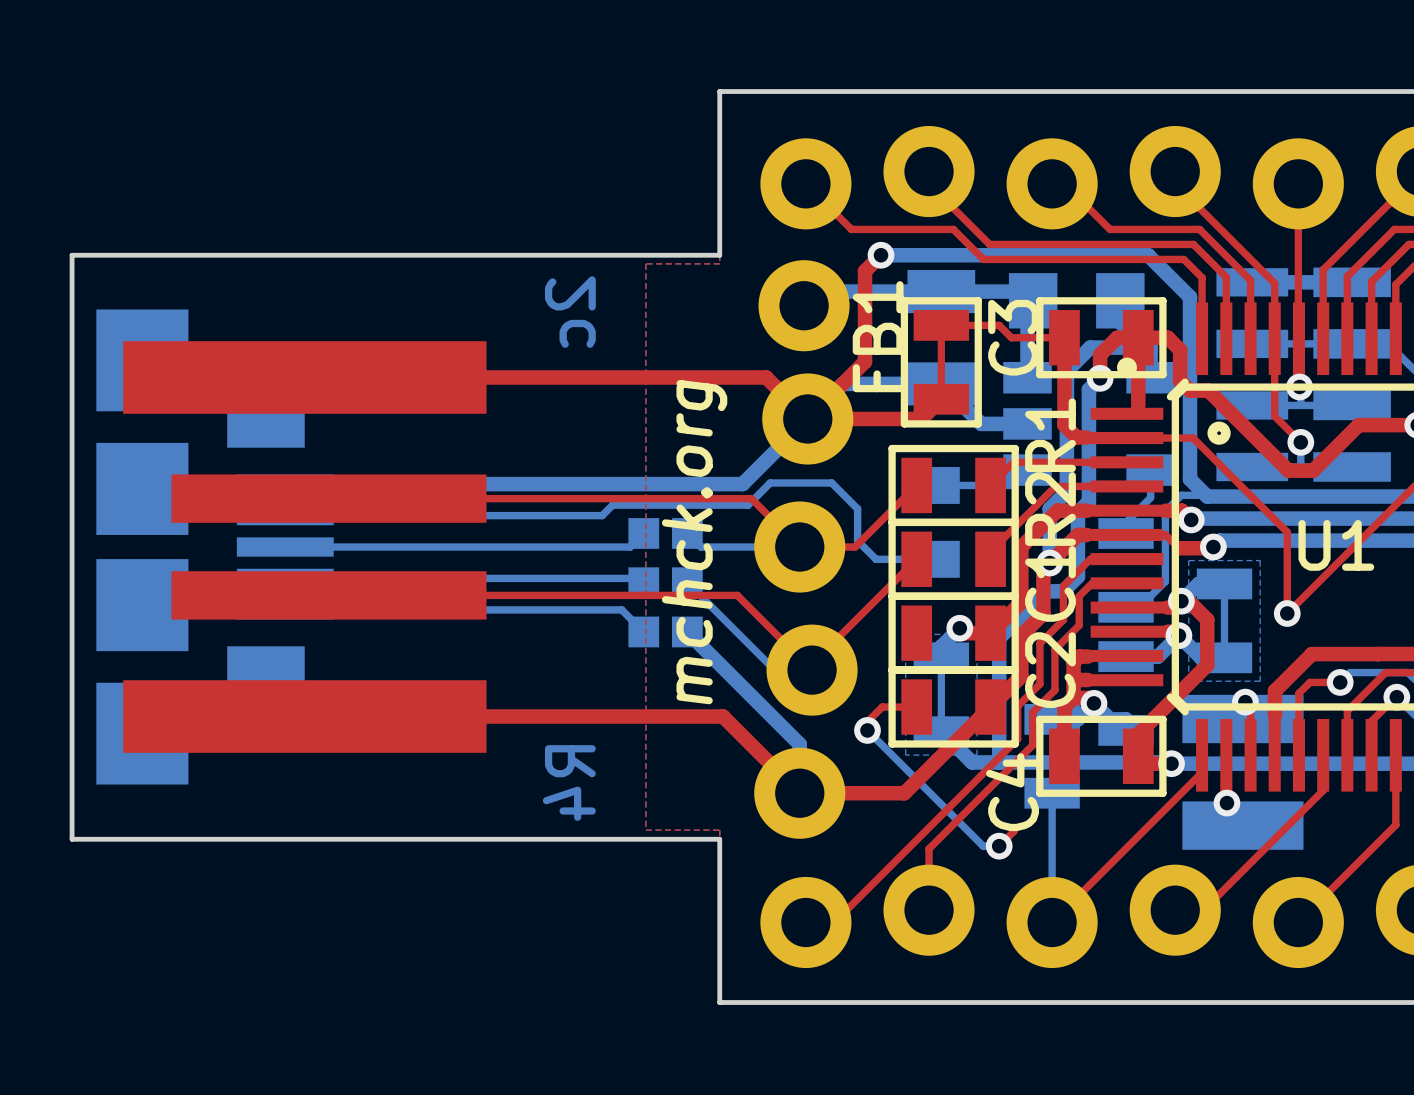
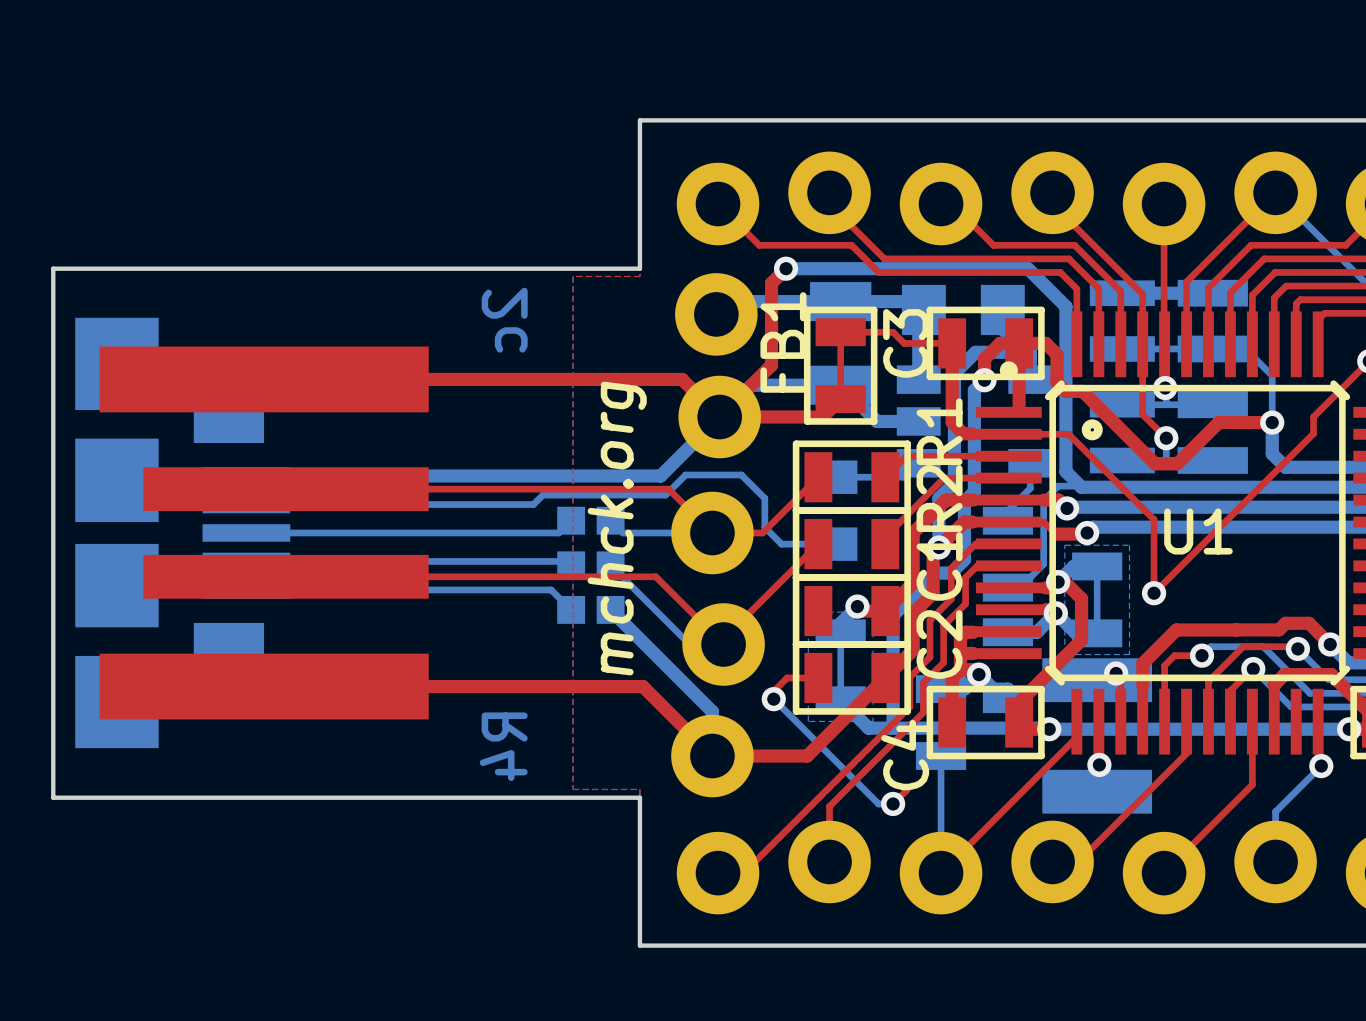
part footprint: [1182, 694, 1304, 850] -> [1042, 658, 1153, 814]

